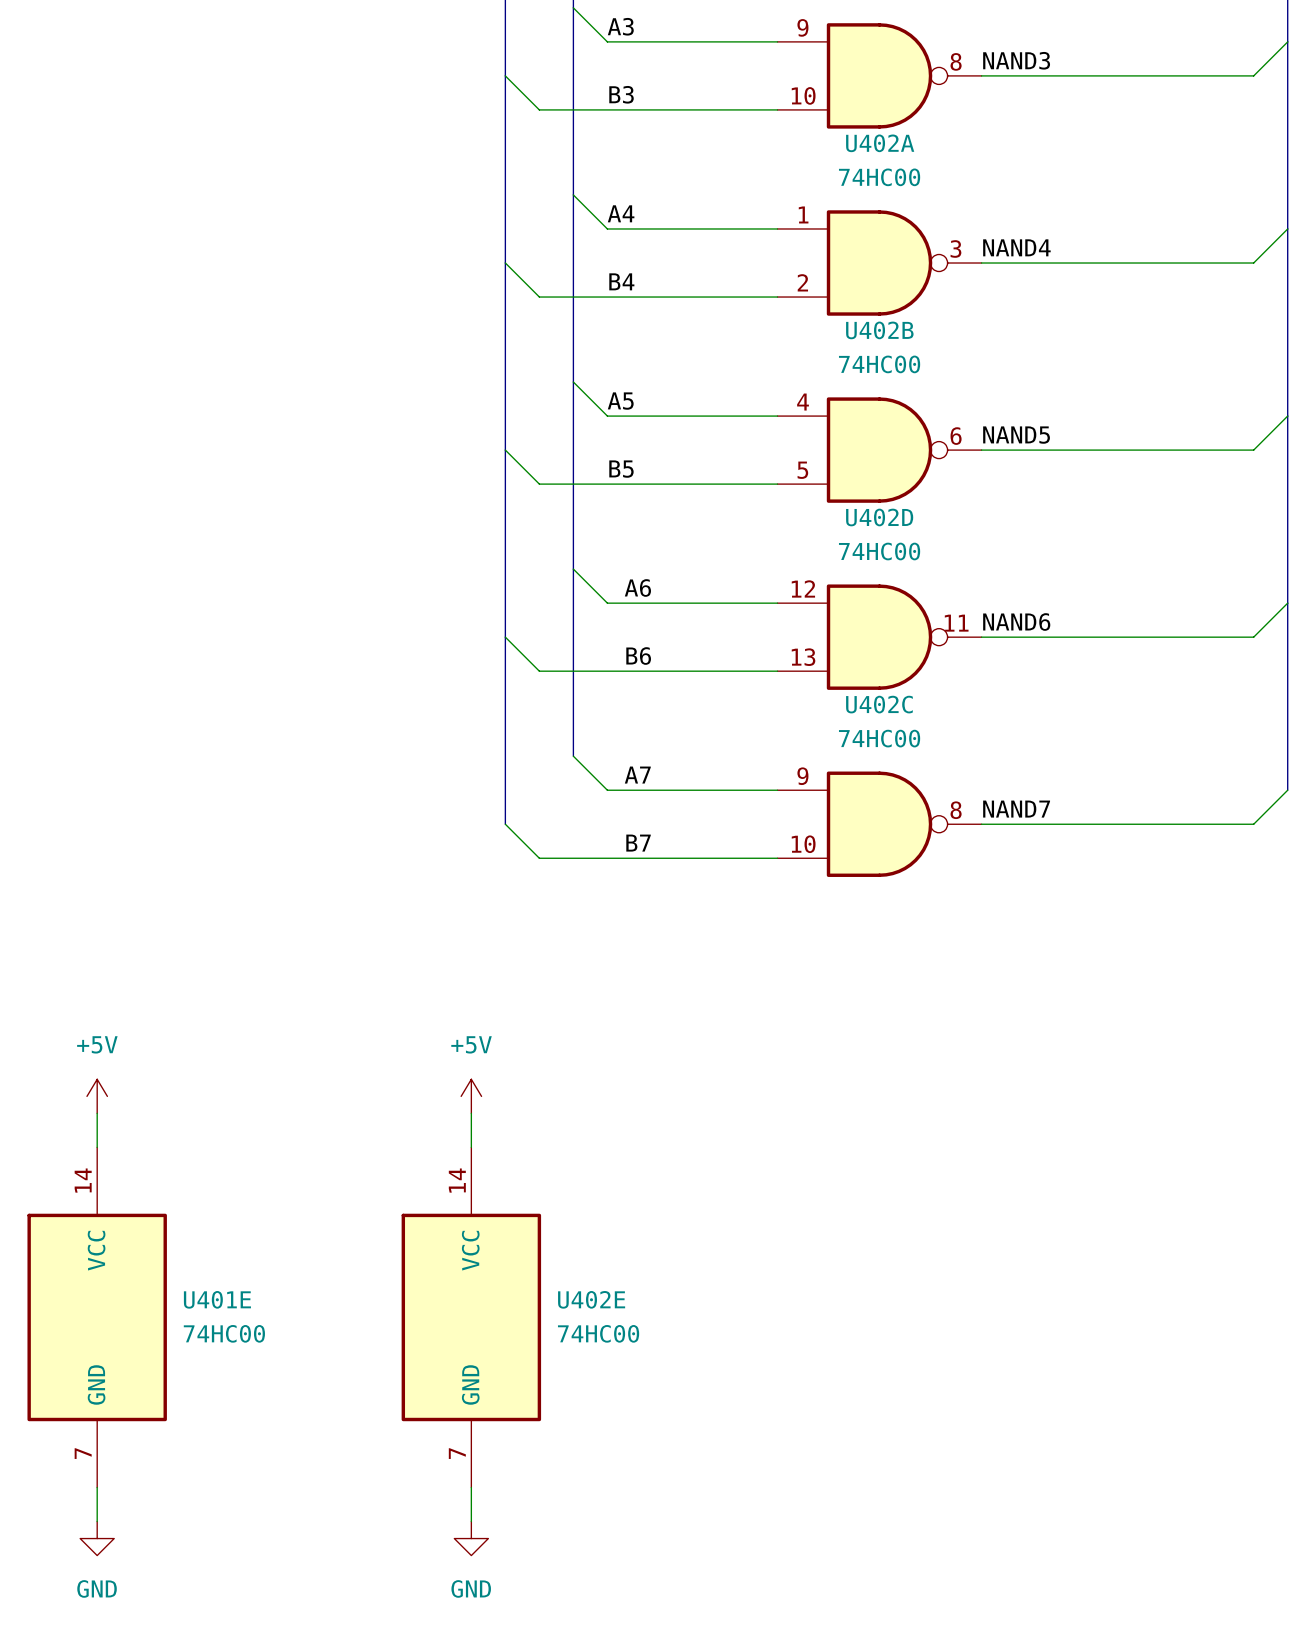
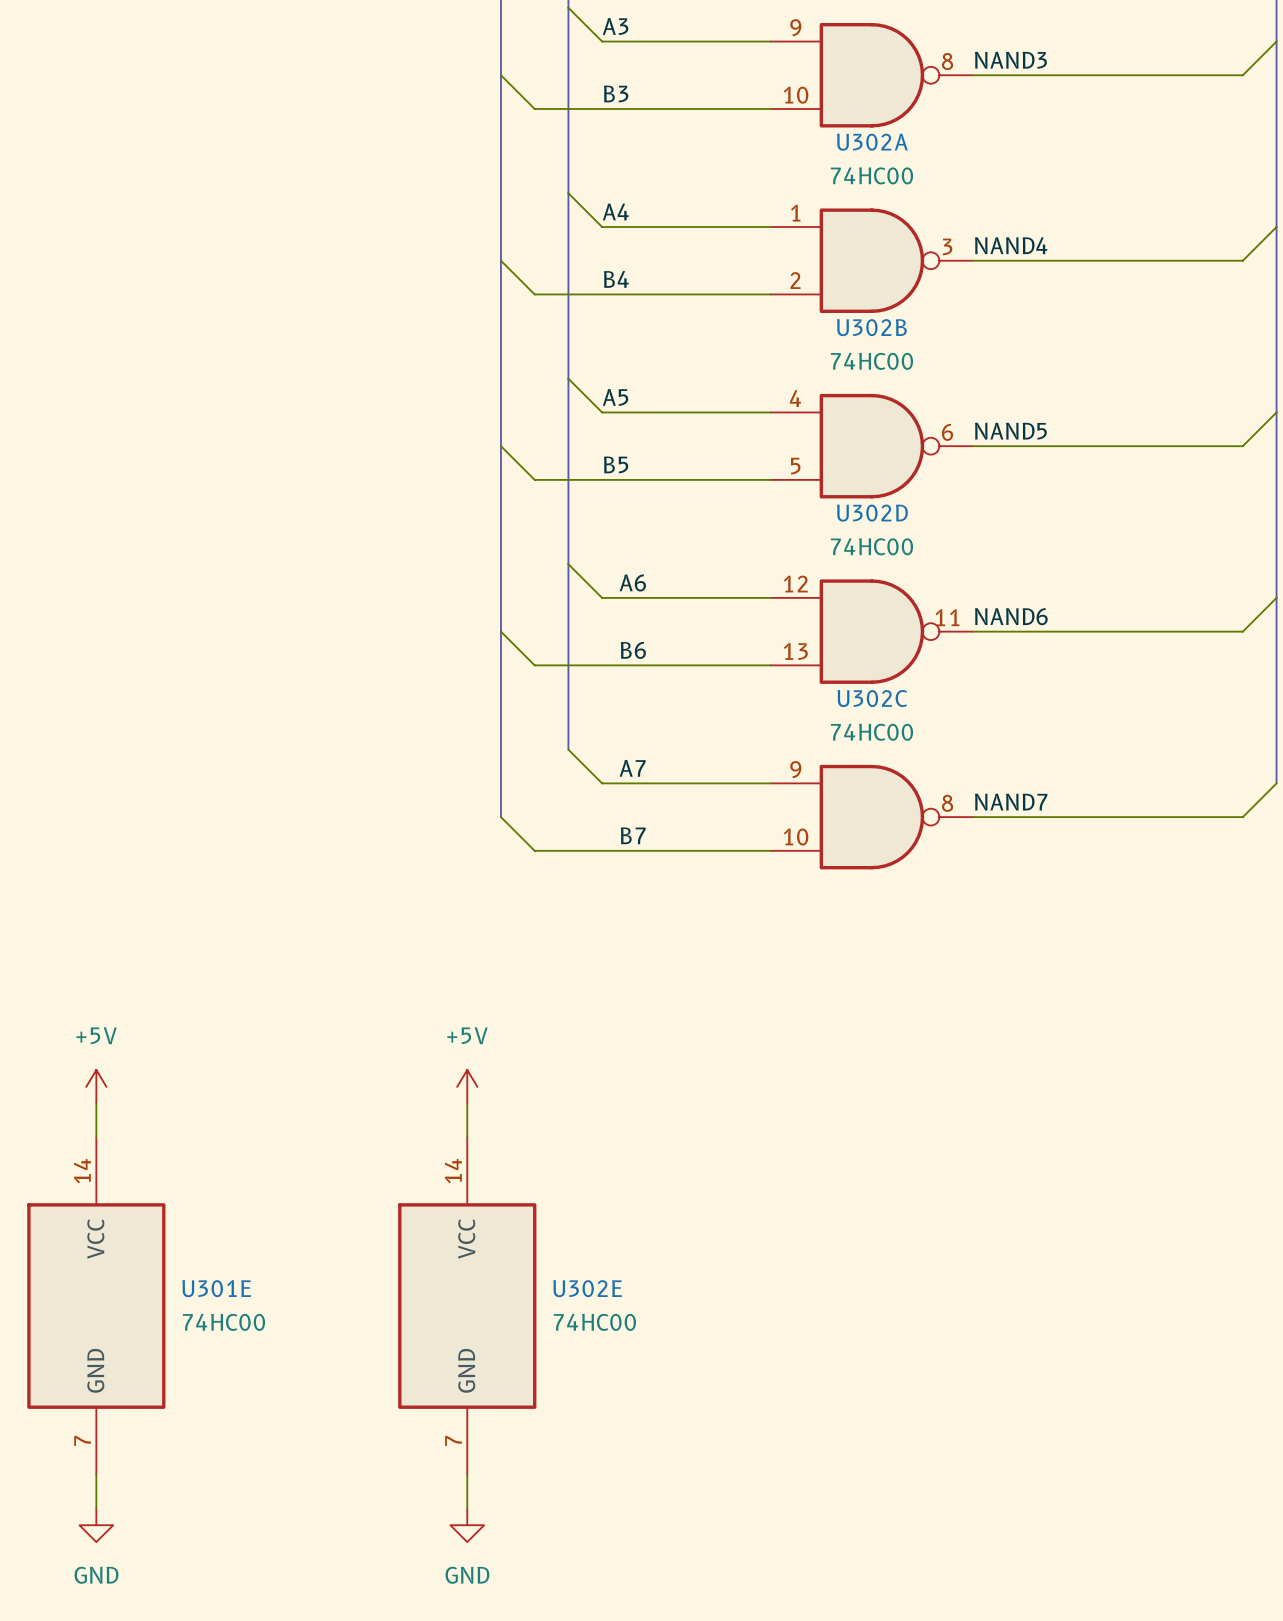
U402A name: U402A (880, 143) -> U302A (872, 142)
U402B name: U402B (879, 330) -> U302B (871, 327)
U402D name: U402D (879, 517) -> U302D (872, 513)
U402C name: U402C (879, 704) -> U302C (872, 698)
U401E name: U401E (217, 1299) -> U301E (216, 1288)
U402E name: U402E (591, 1299) -> U302E (587, 1288)

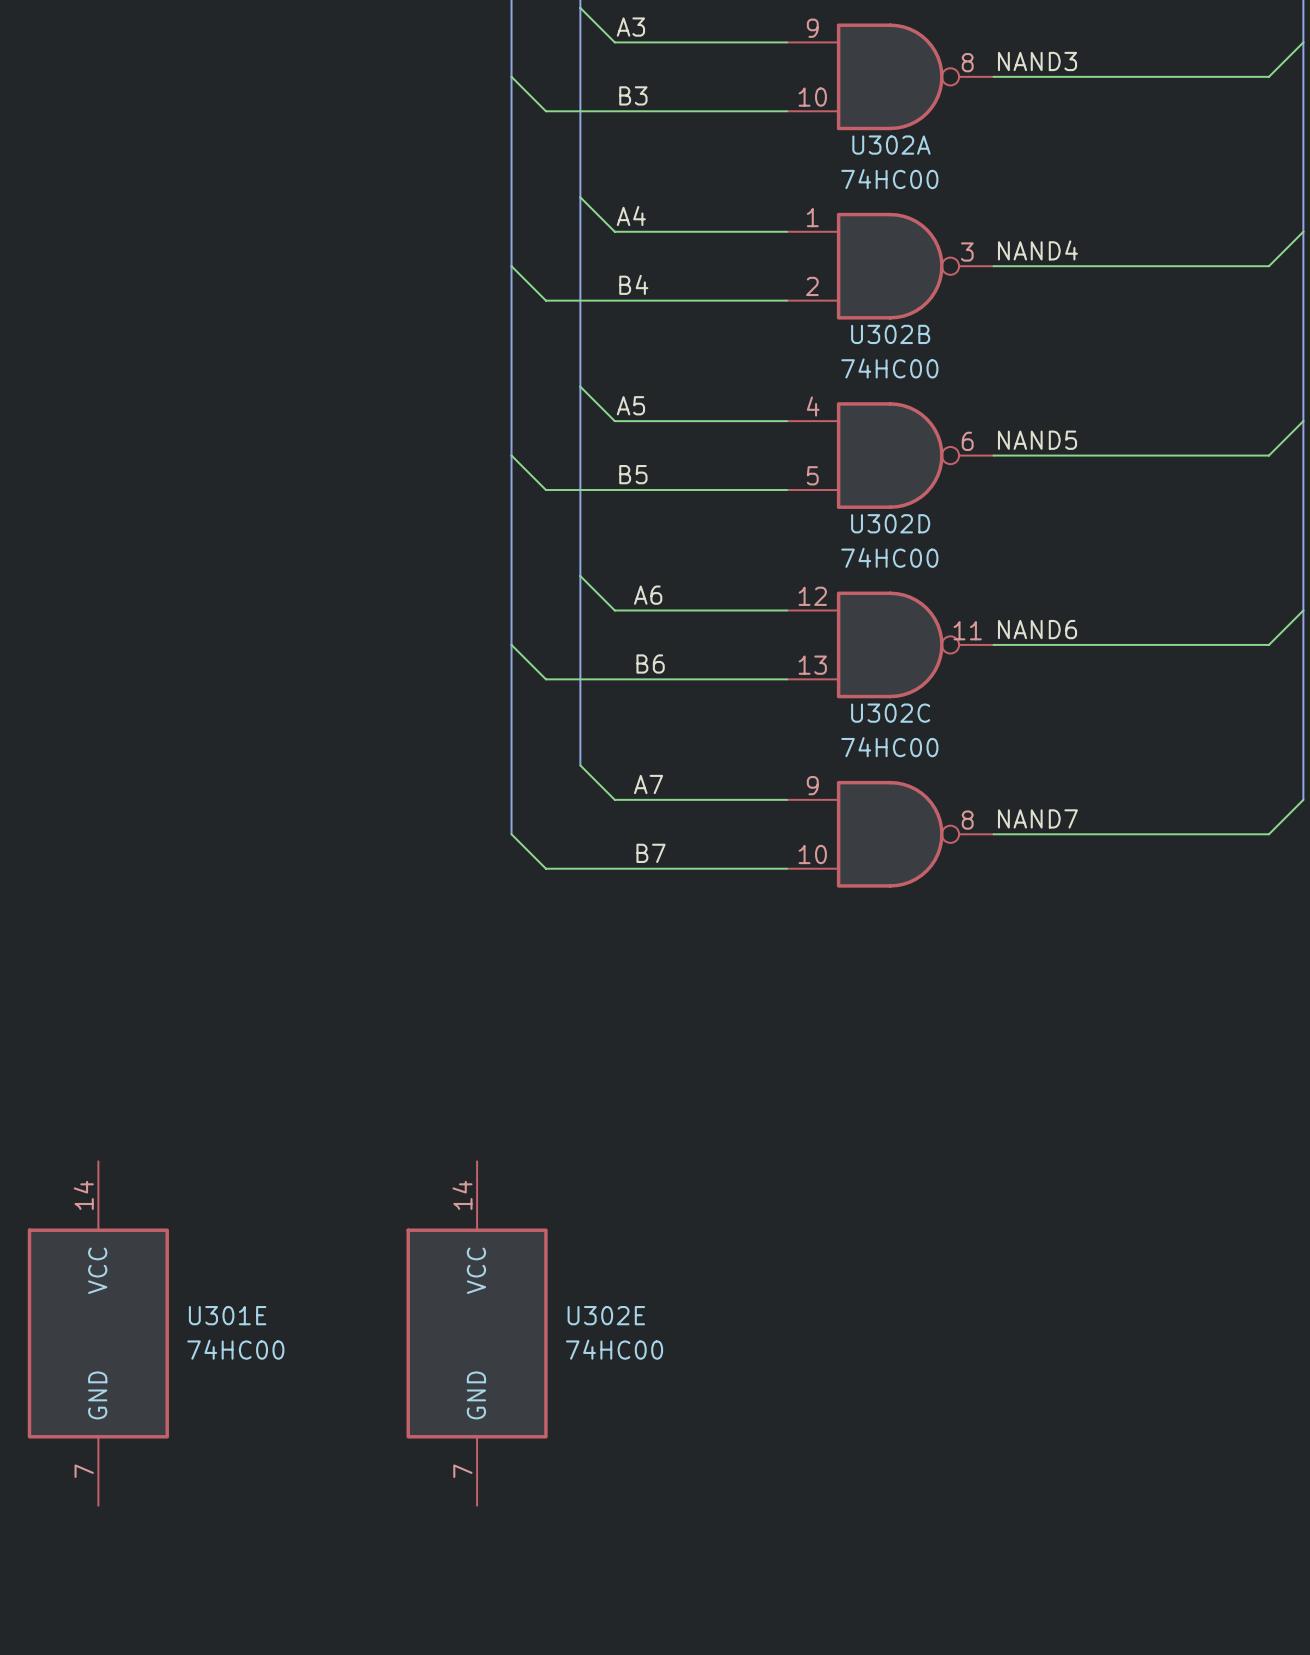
power symbol: +5V (96, 1086) -> none
power symbol: +5V (467, 1086) -> none
wire: (96, 1103) (96, 1137) -> none
wire: (467, 1103) (467, 1137) -> none
wire: (96, 1474) (96, 1508) -> none
wire: (467, 1474) (467, 1508) -> none
power symbol: GND (96, 1525) -> none
power symbol: GND (467, 1525) -> none

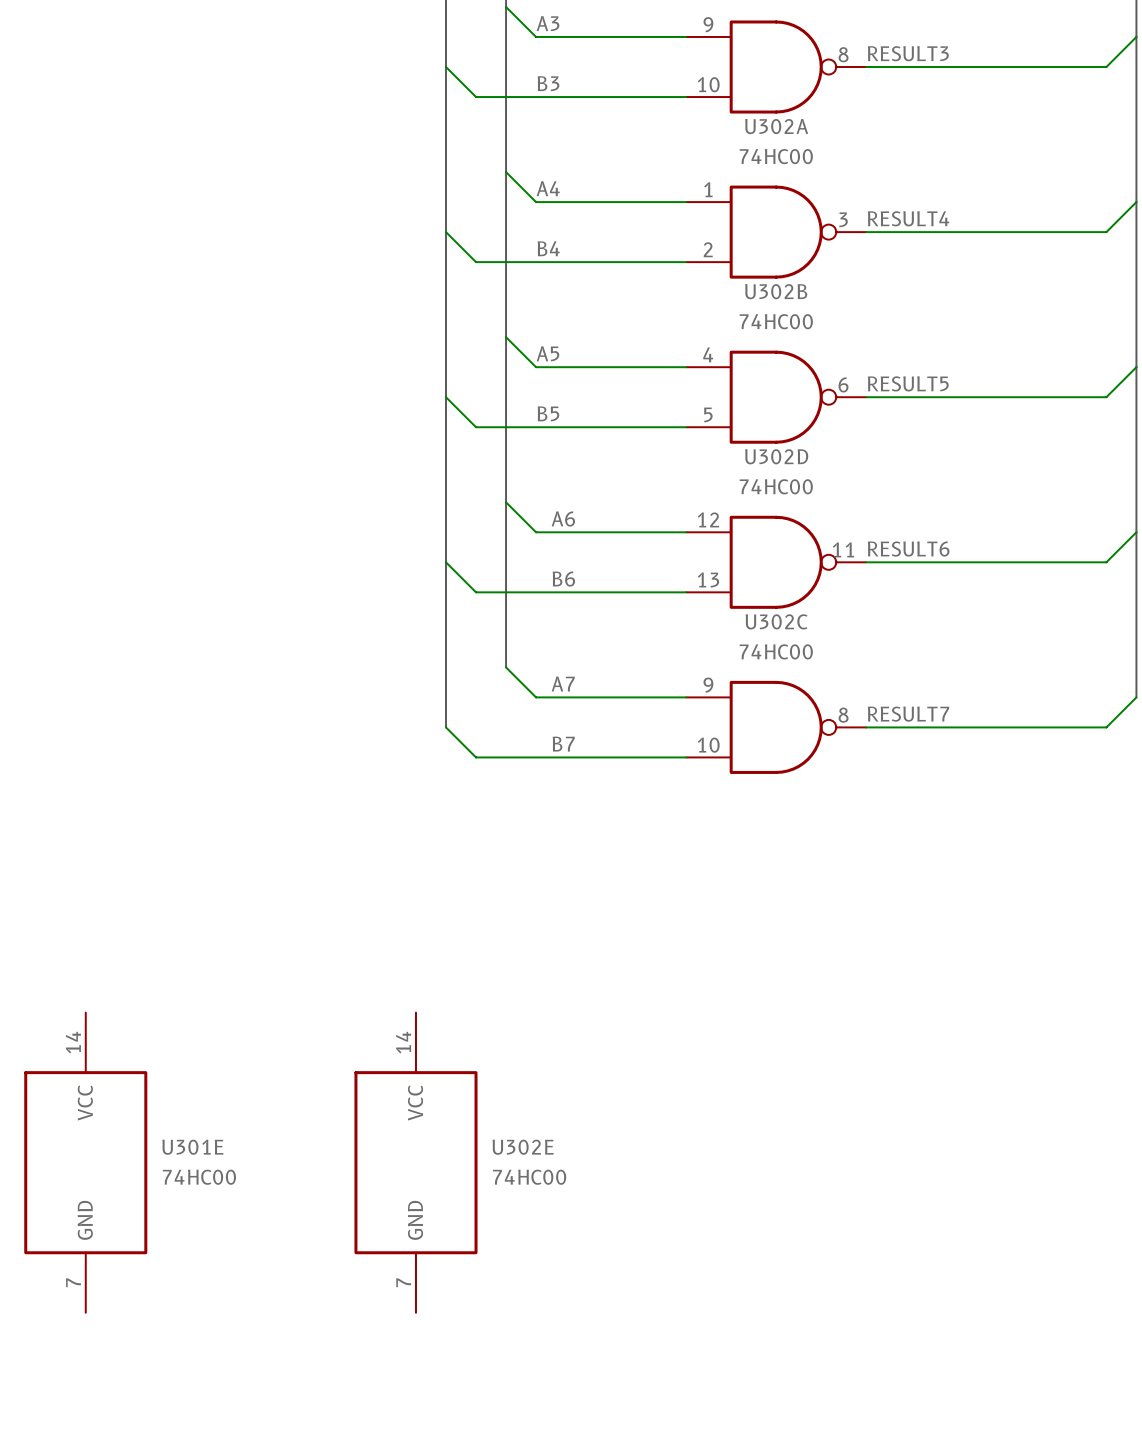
label: NAND3 (1037, 61) -> RESULT3 (908, 53)
label: NAND4 (1037, 250) -> RESULT4 (908, 218)
label: NAND5 (1037, 440) -> RESULT5 (908, 383)
label: NAND6 (1037, 629) -> RESULT6 (908, 549)
label: NAND7 (1037, 818) -> RESULT7 (908, 714)

